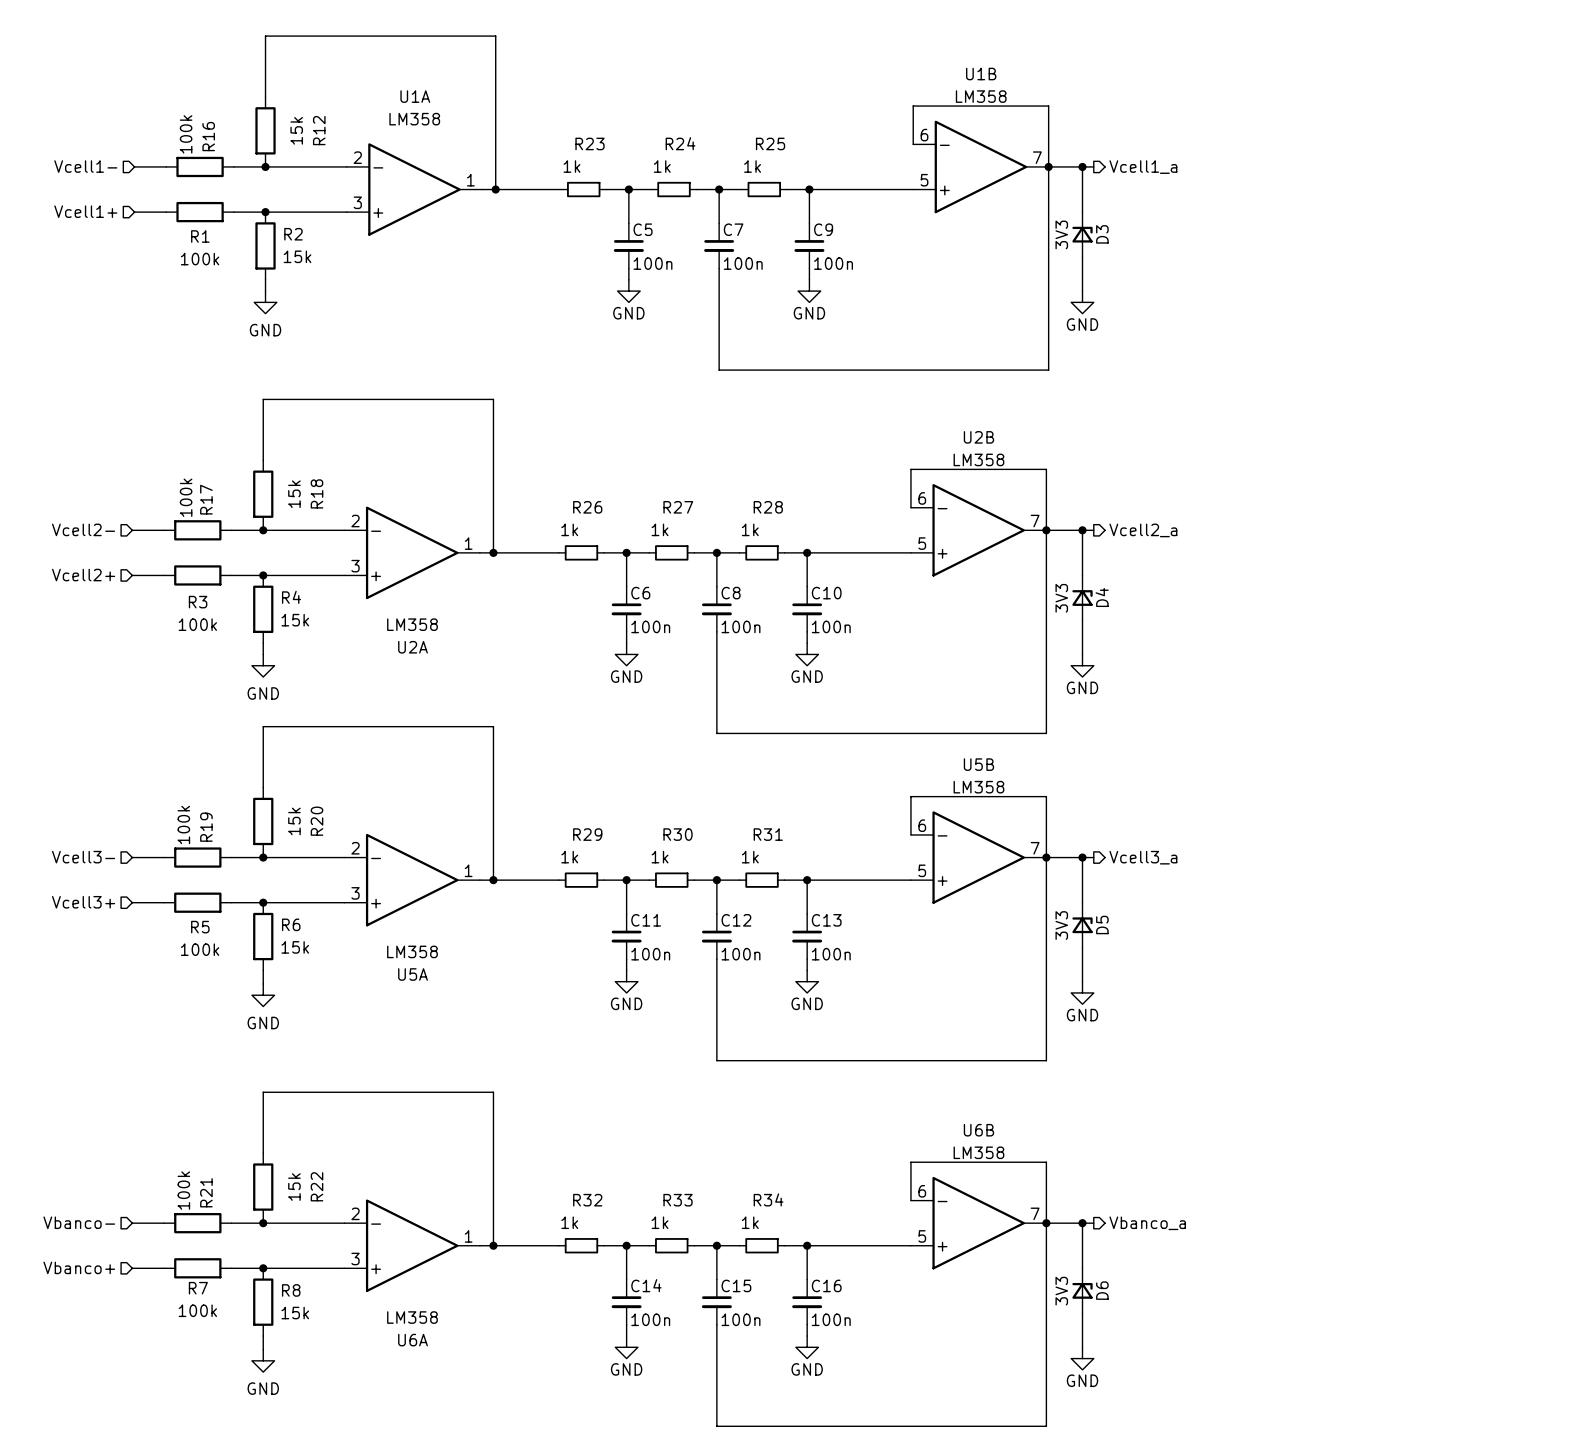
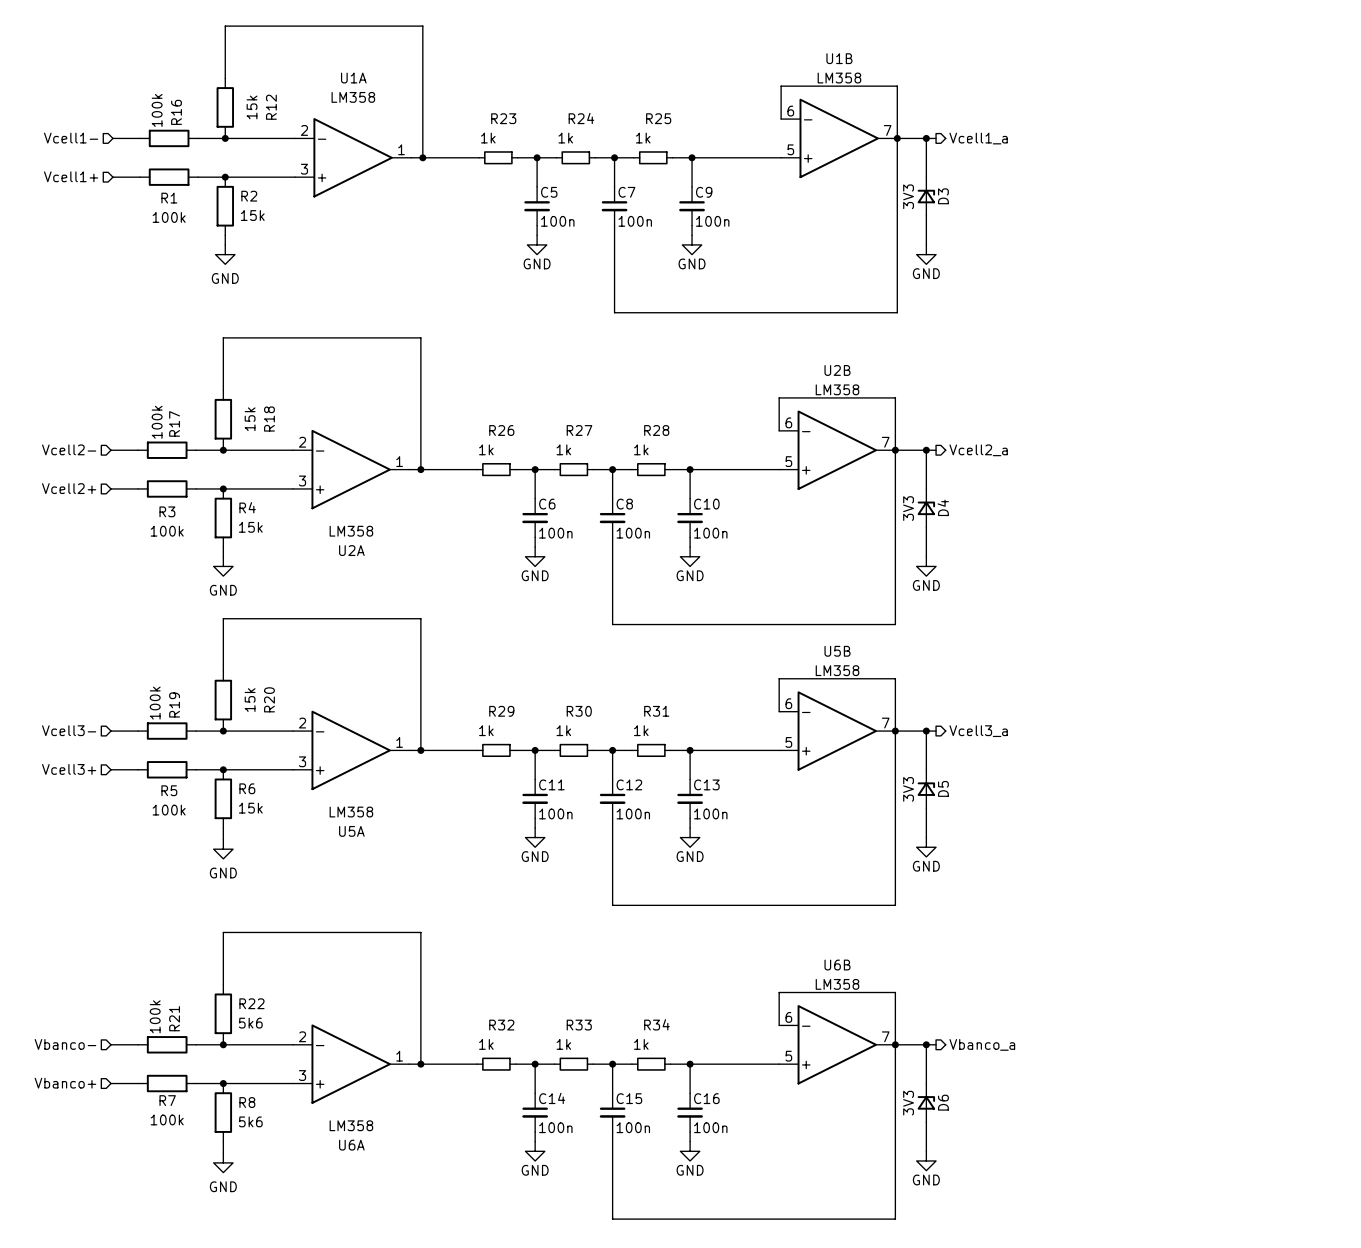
R22 name rotation: 0° (317, 1186) -> 90° clockwise (251, 1003)
R22 value: 15k (294, 1187) -> 5k6 (250, 1023)
R8 value: 15k (295, 1313) -> 5k6 (250, 1121)

